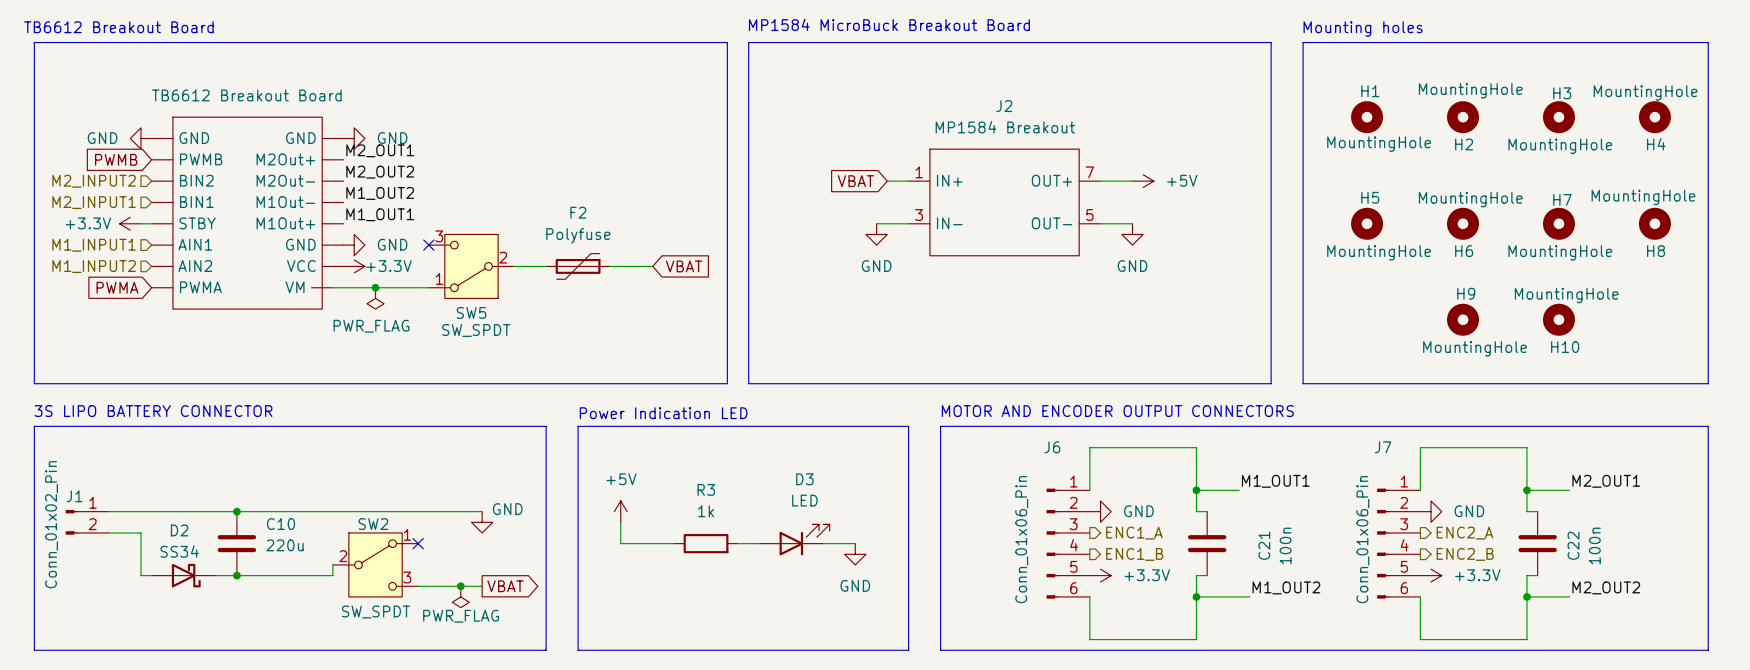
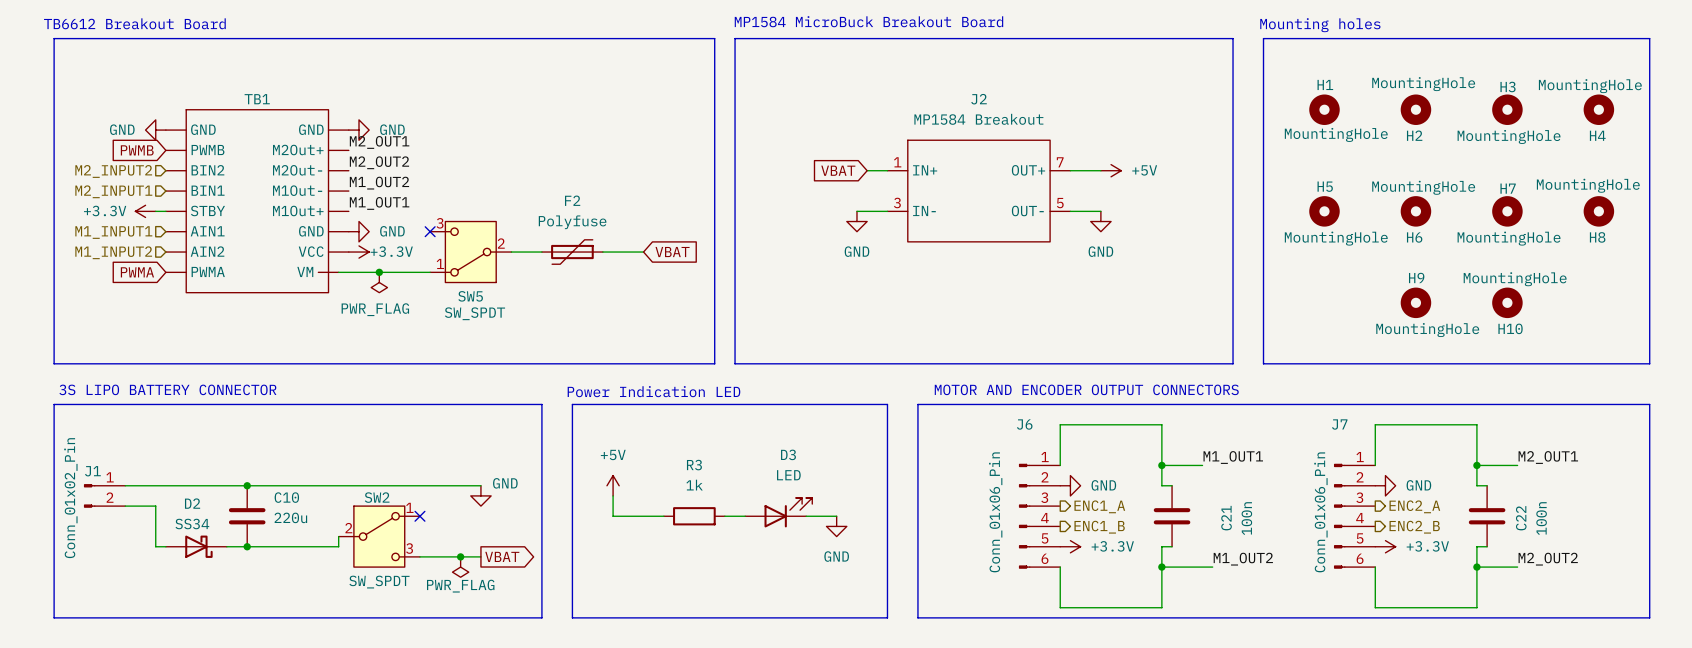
TB1 value: TB6612 Breakout Board (246, 95) -> none
TB1 name: none -> TB1 (257, 99)

